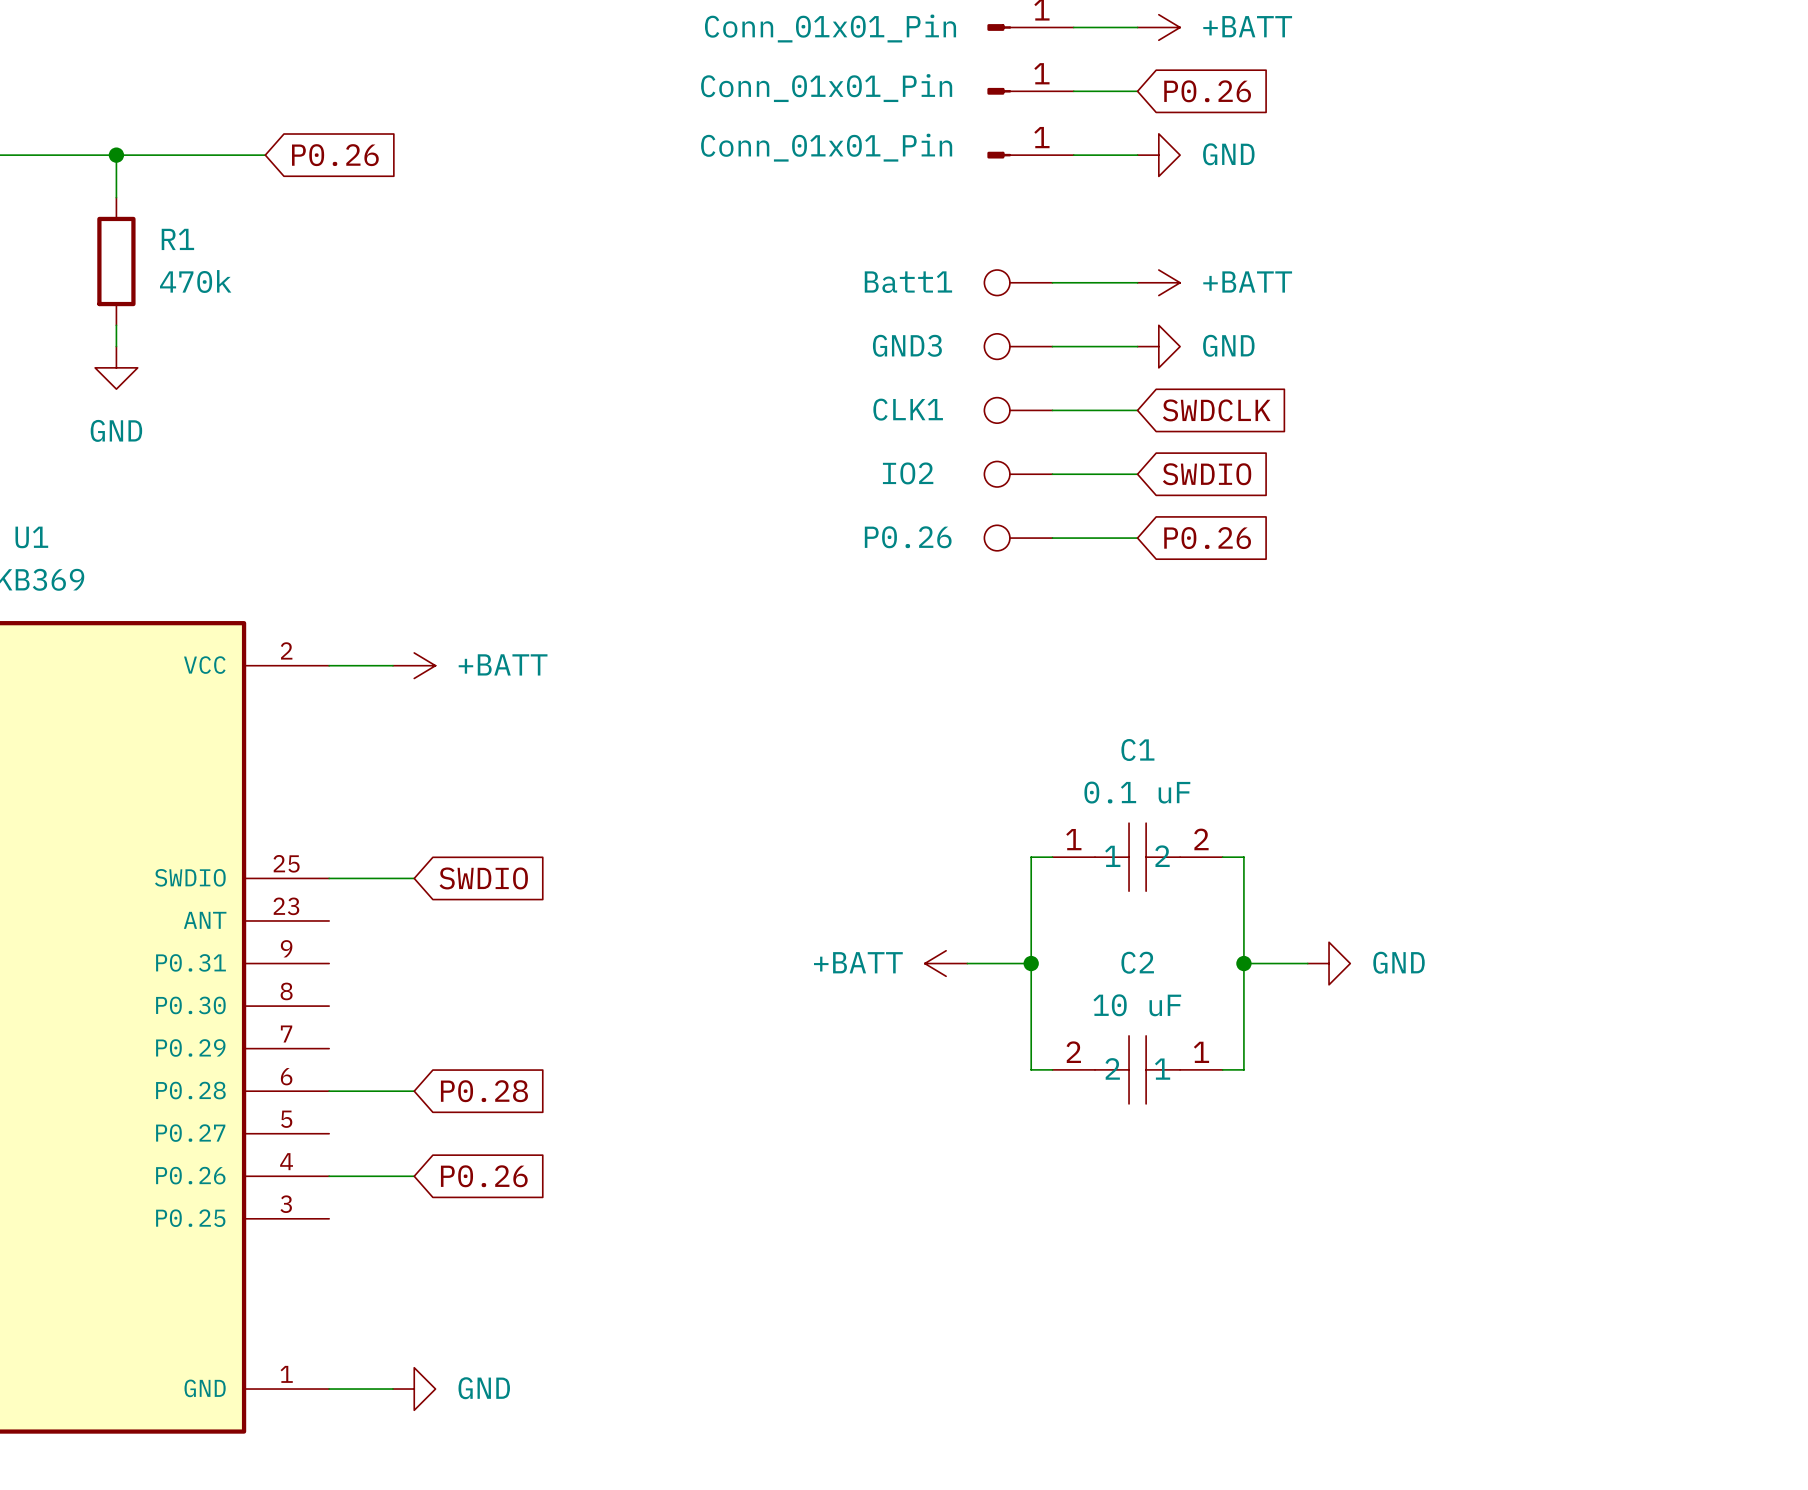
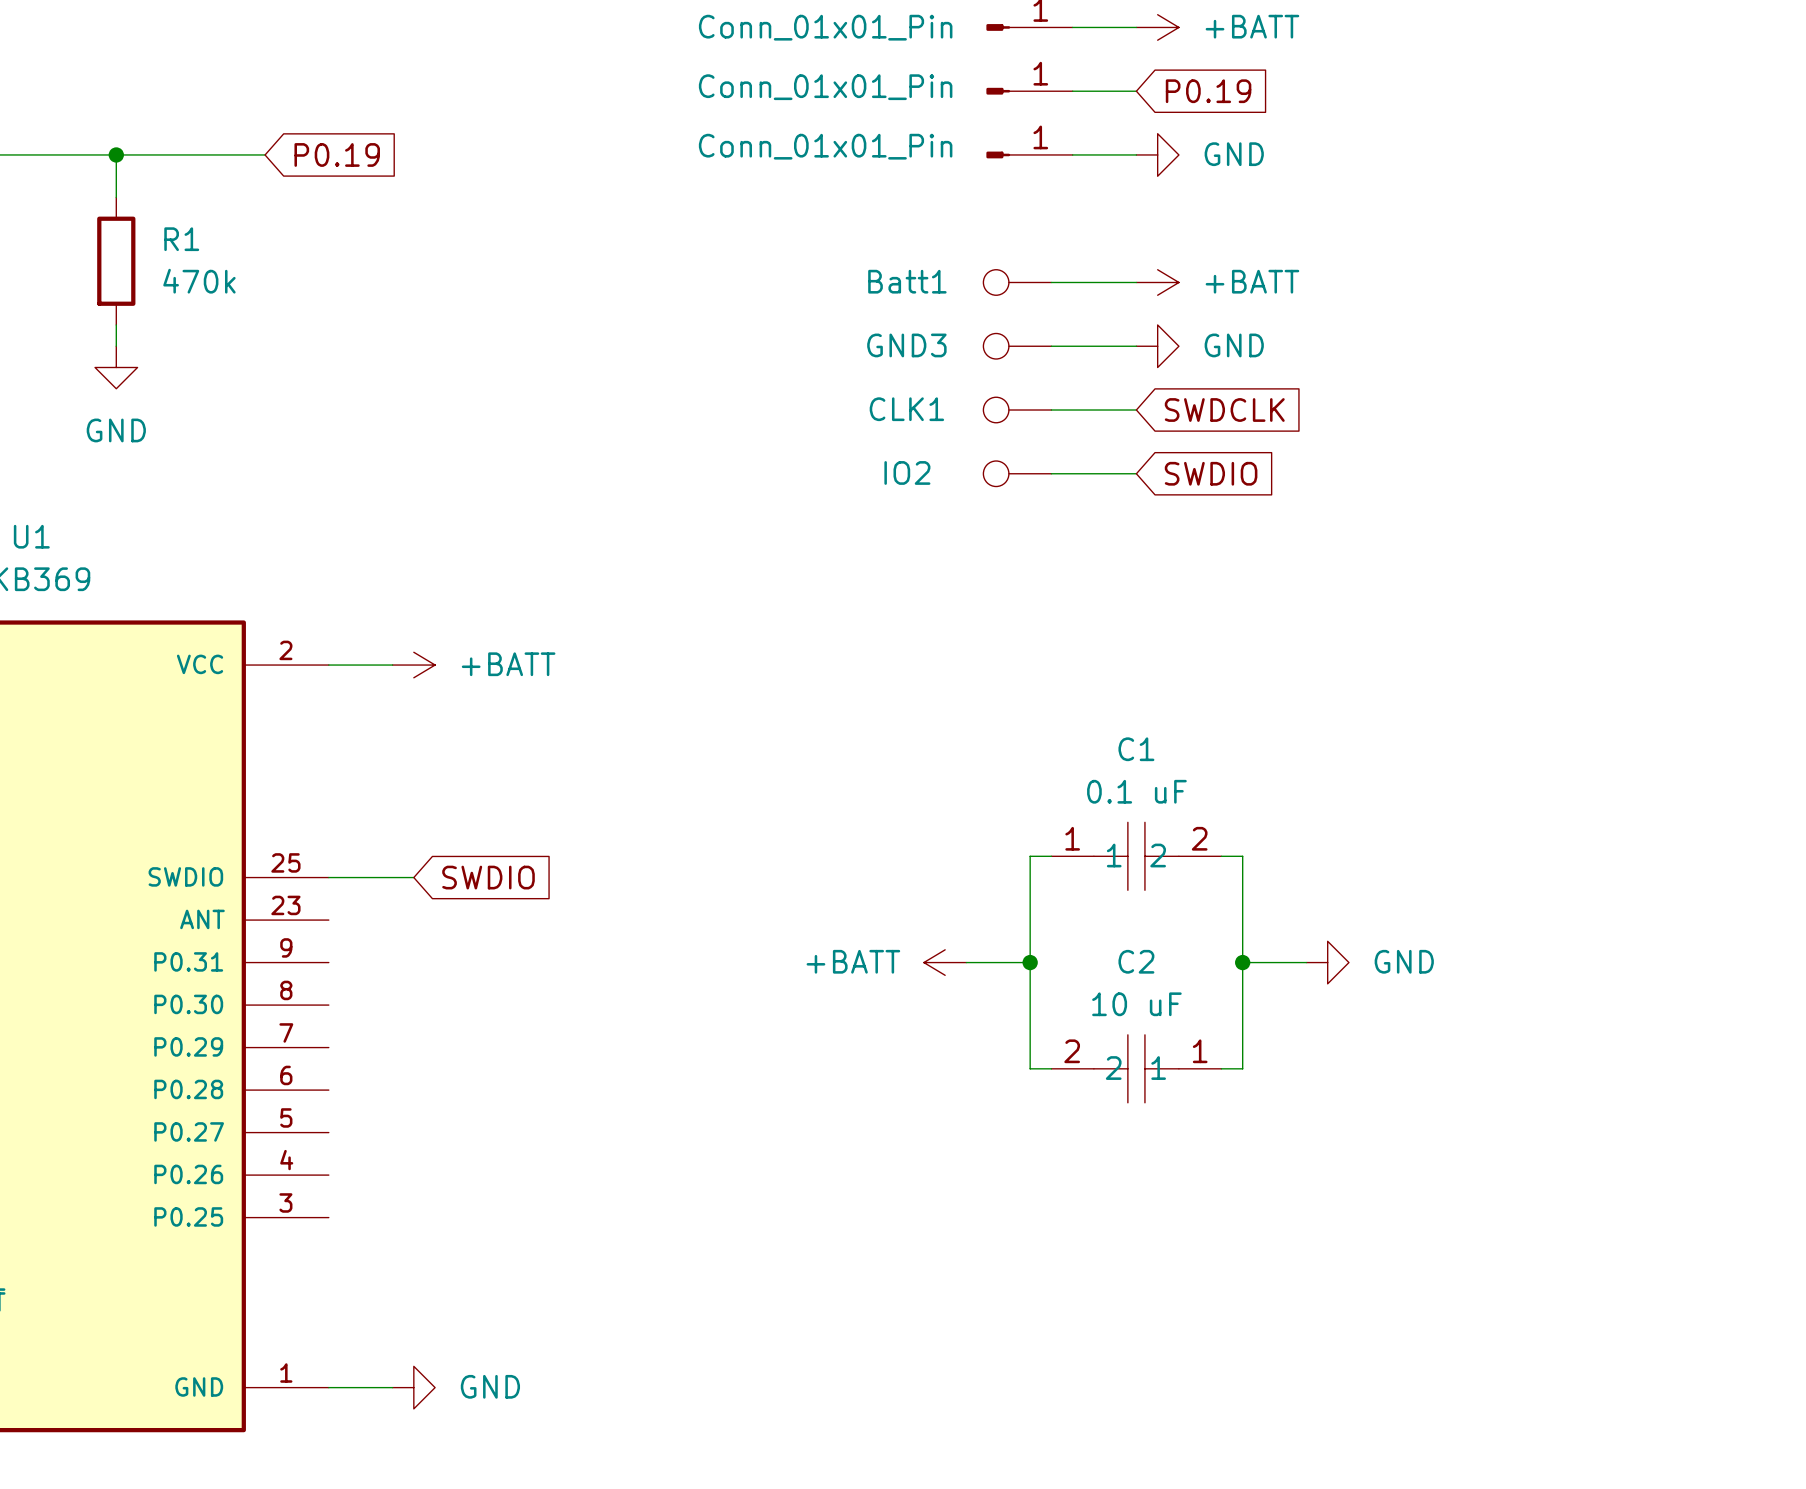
global label: P0.26 (1207, 91) -> P0.19 (1208, 91)
global label: P0.26 (335, 155) -> P0.19 (337, 154)
P0.26: (1018, 538) -> none
wire: (1052, 538) (1137, 538) -> none
global label: P0.26 (1207, 538) -> none
wire: (329, 1091) (414, 1091) -> none
global label: P0.28 (484, 1091) -> none
wire: (329, 1176) (414, 1176) -> none
global label: P0.26 (484, 1176) -> none

